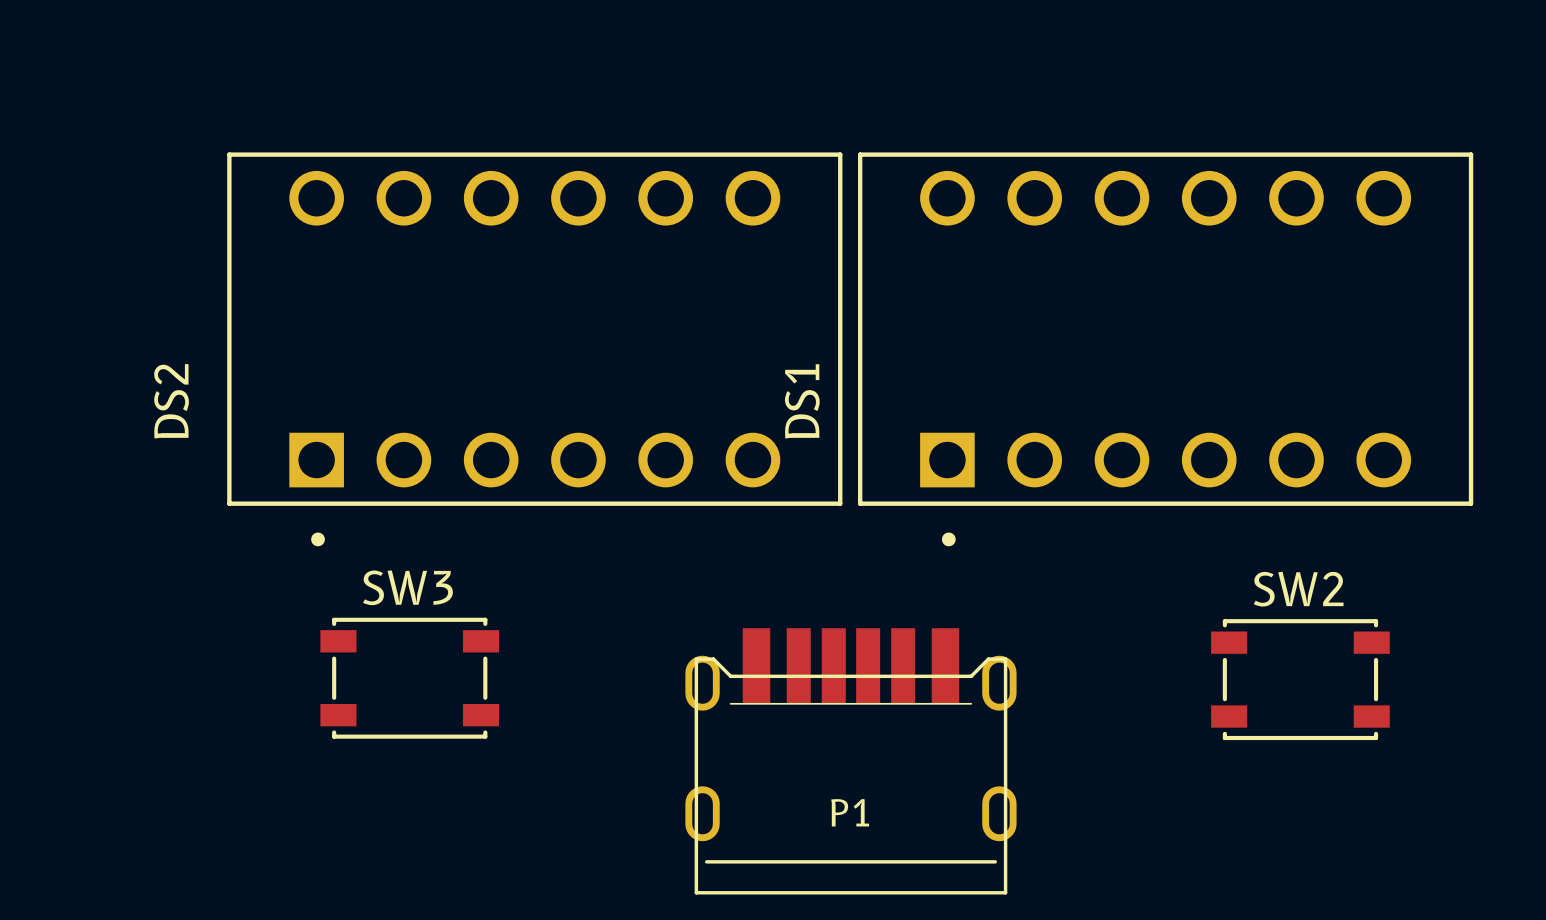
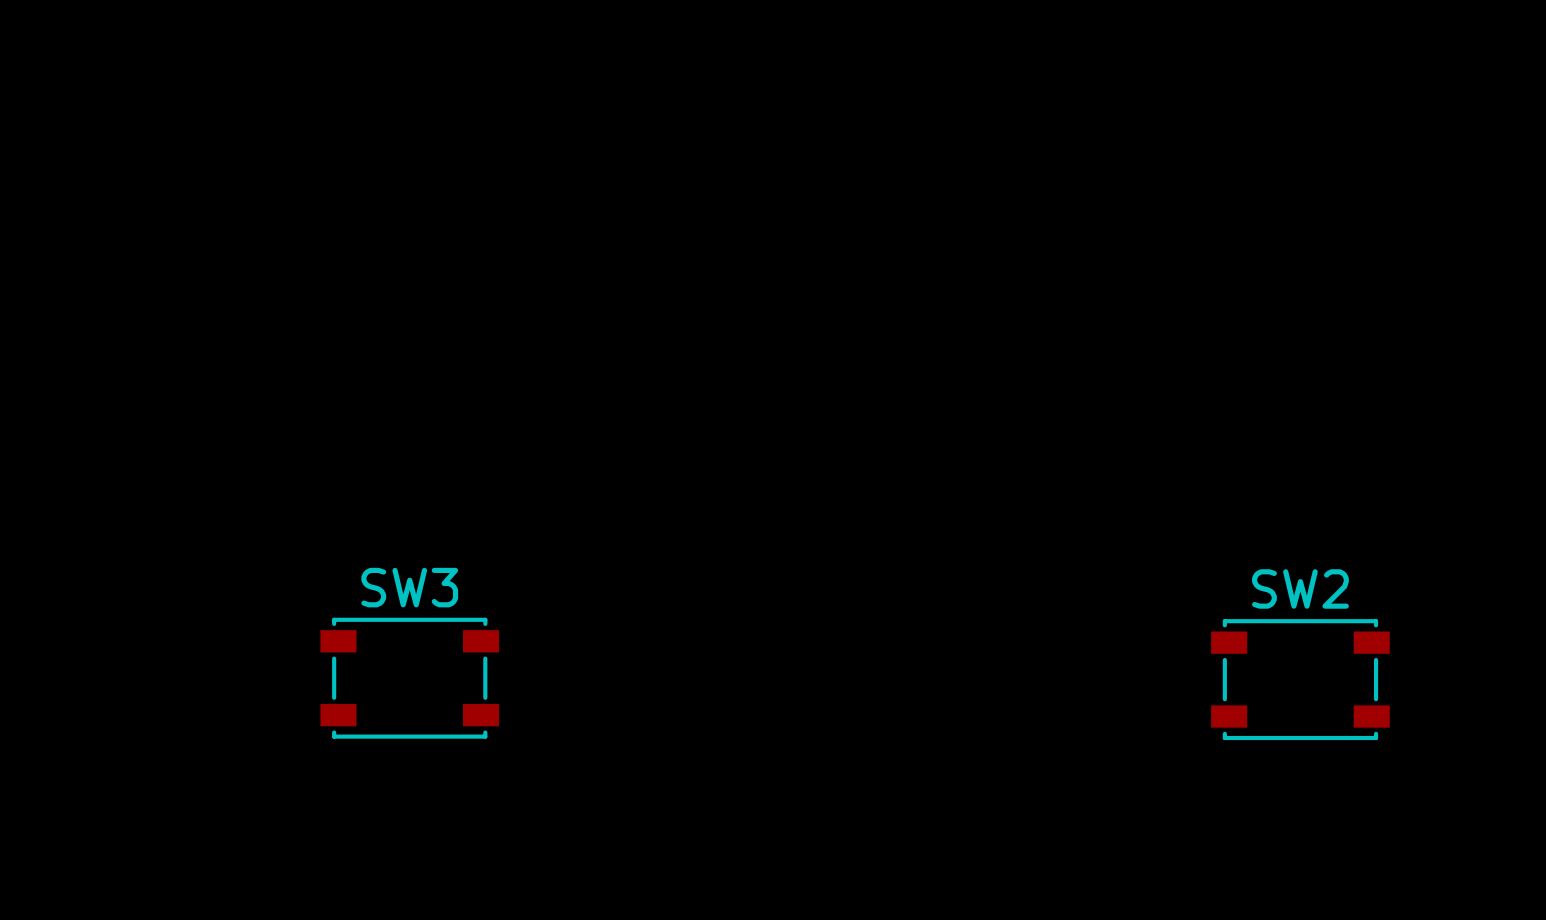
DS2: (534, 349) -> none
DS1: (1165, 349) -> none
P1: (850, 761) -> none

